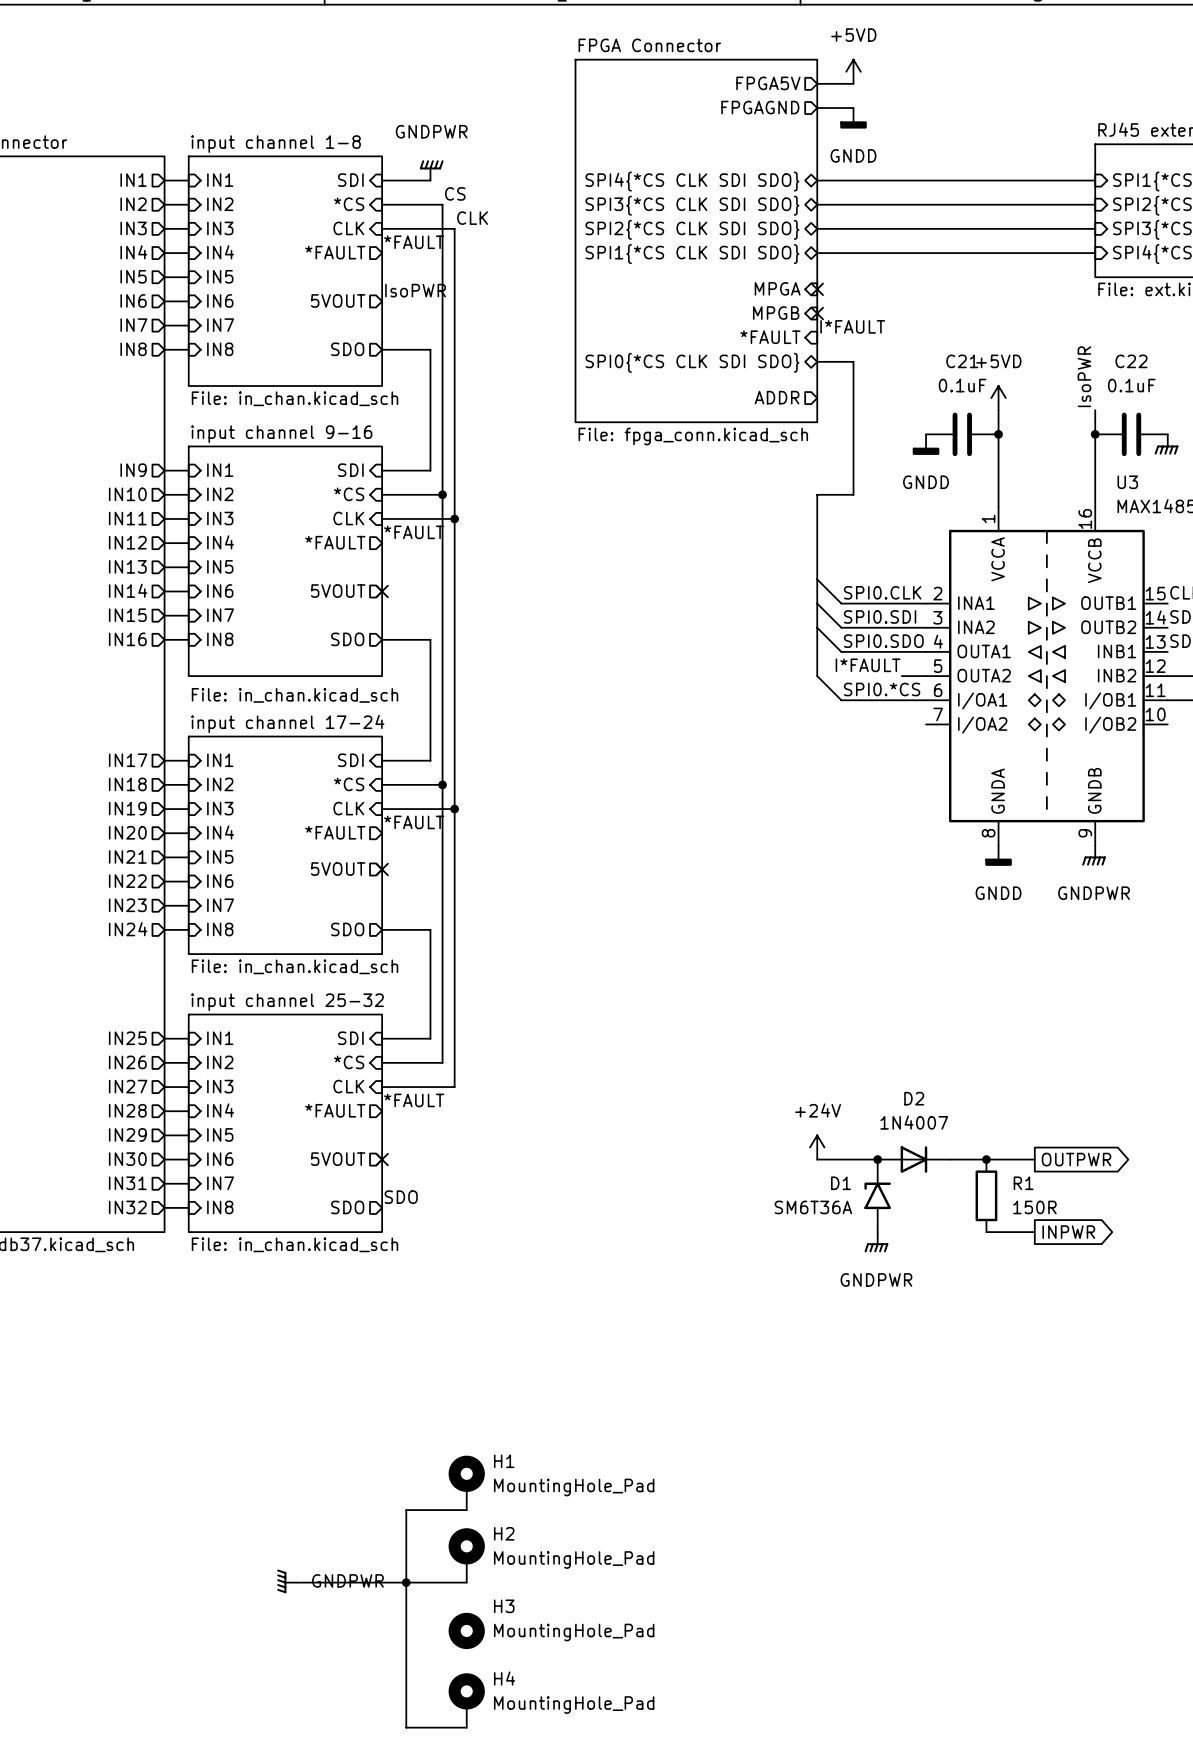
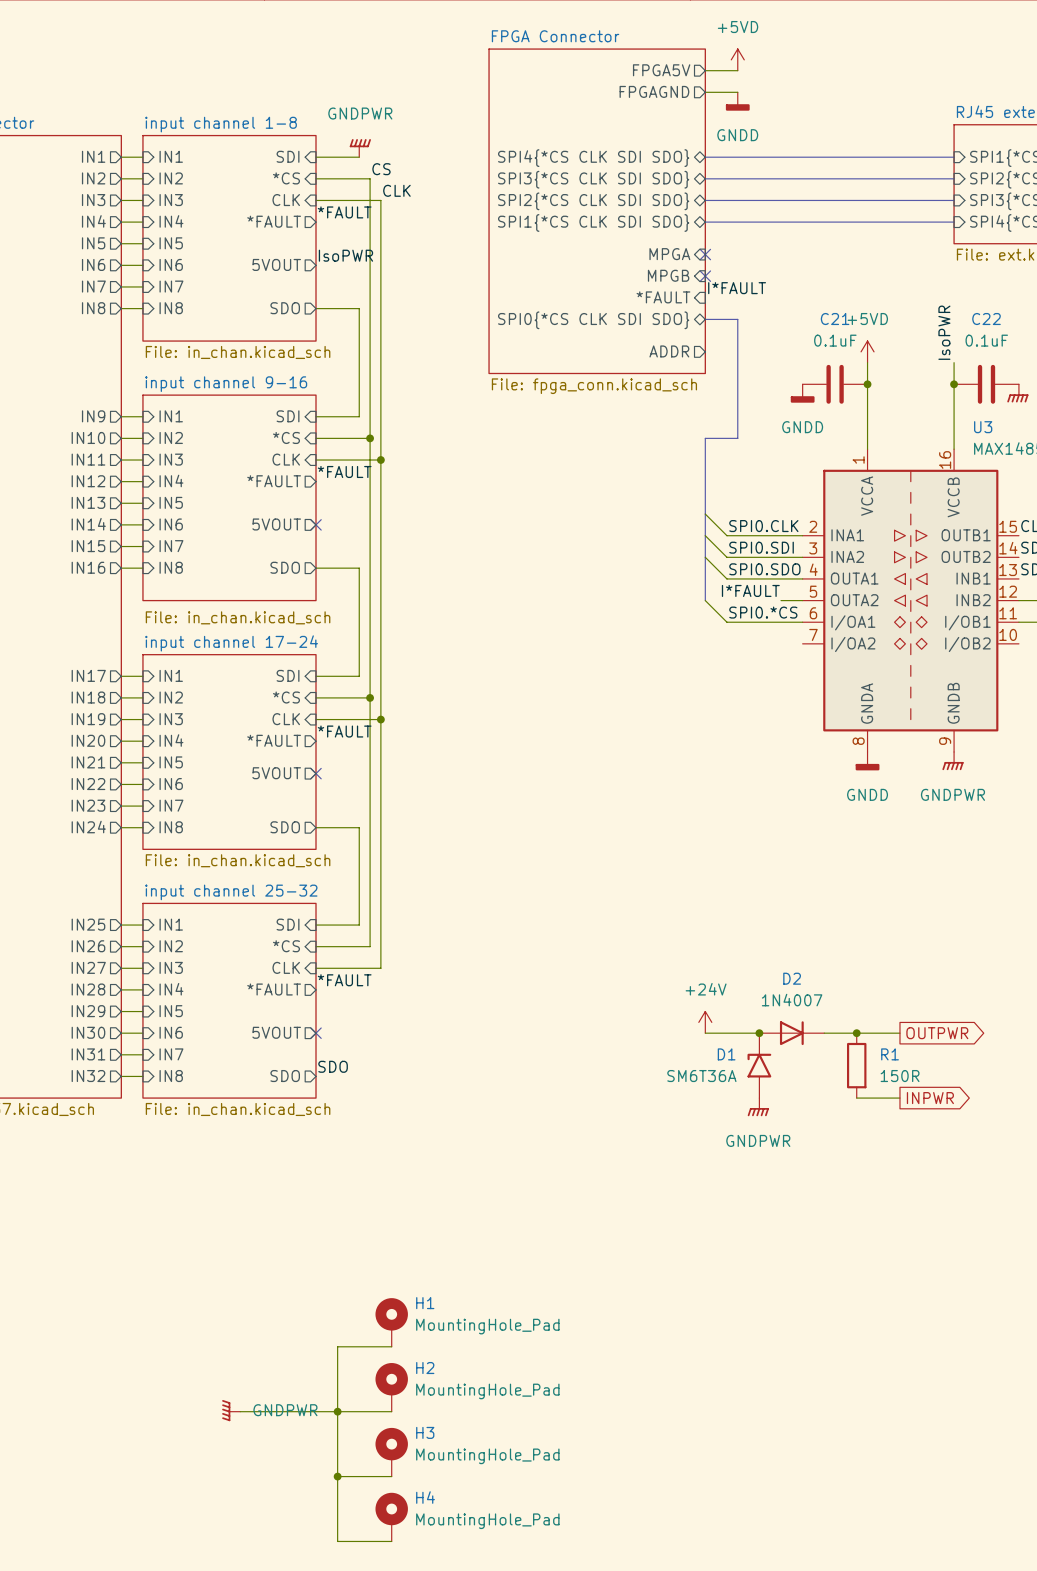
H3 symbol: [448, 1612, 485, 1650] -> [375, 1427, 408, 1477]
wire: none -> (337, 1476) (391, 1476)
junction: none -> (337, 1476)

